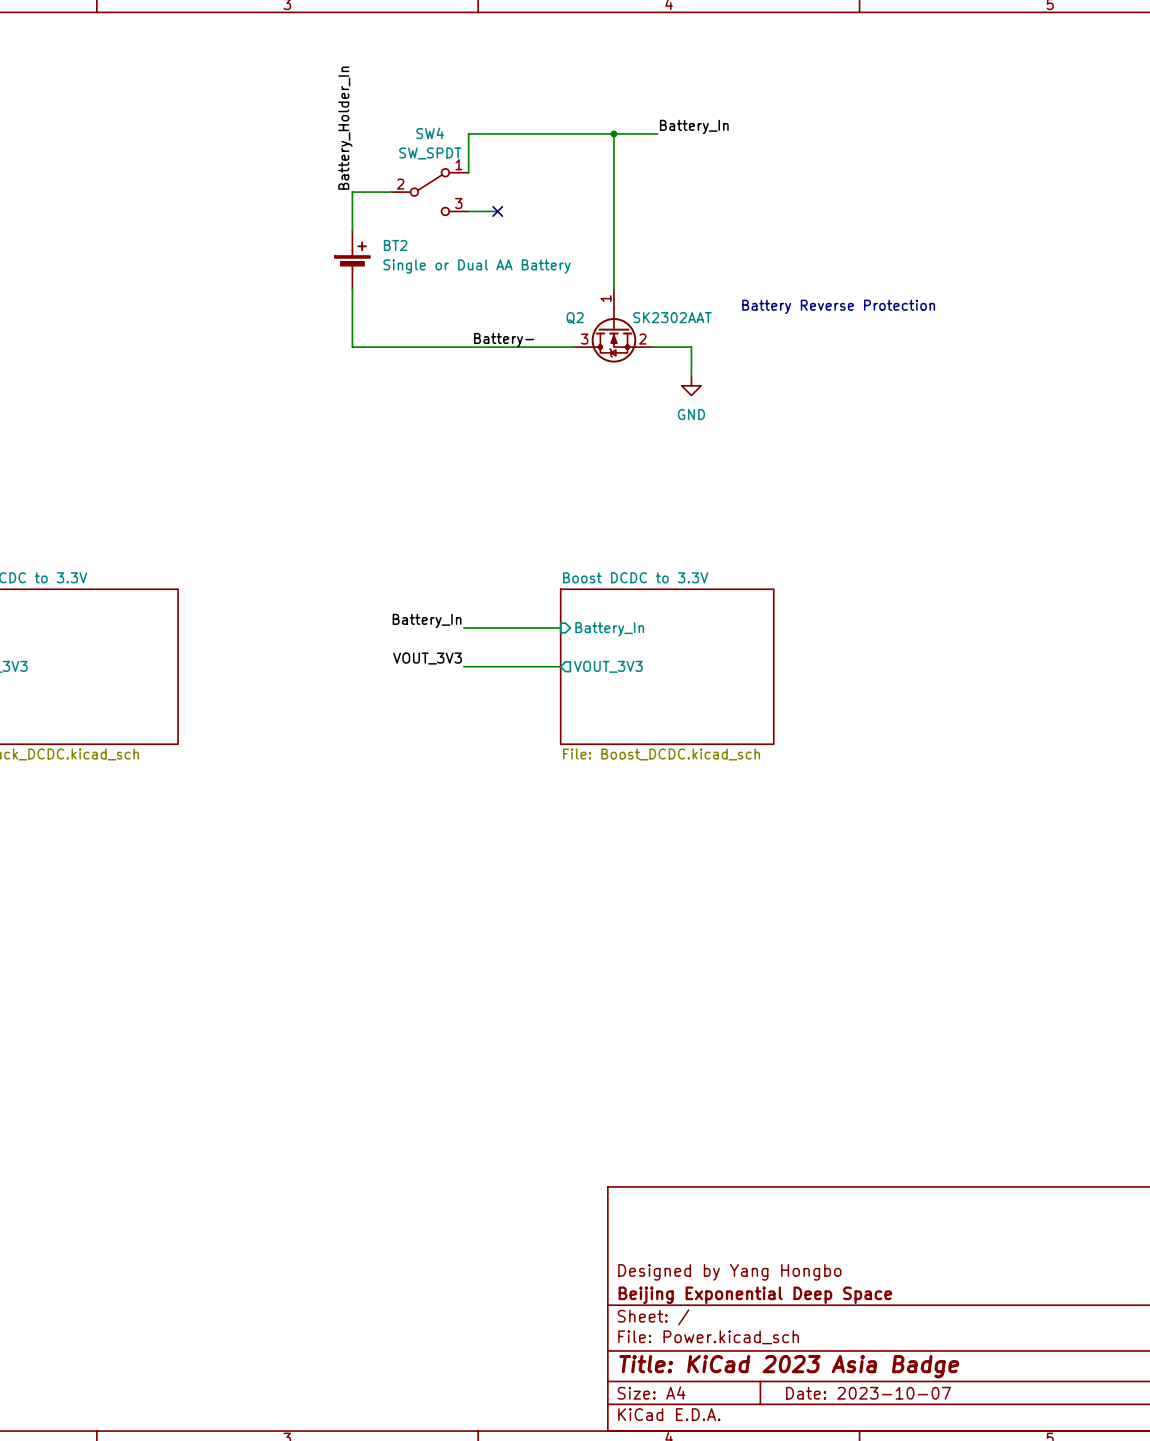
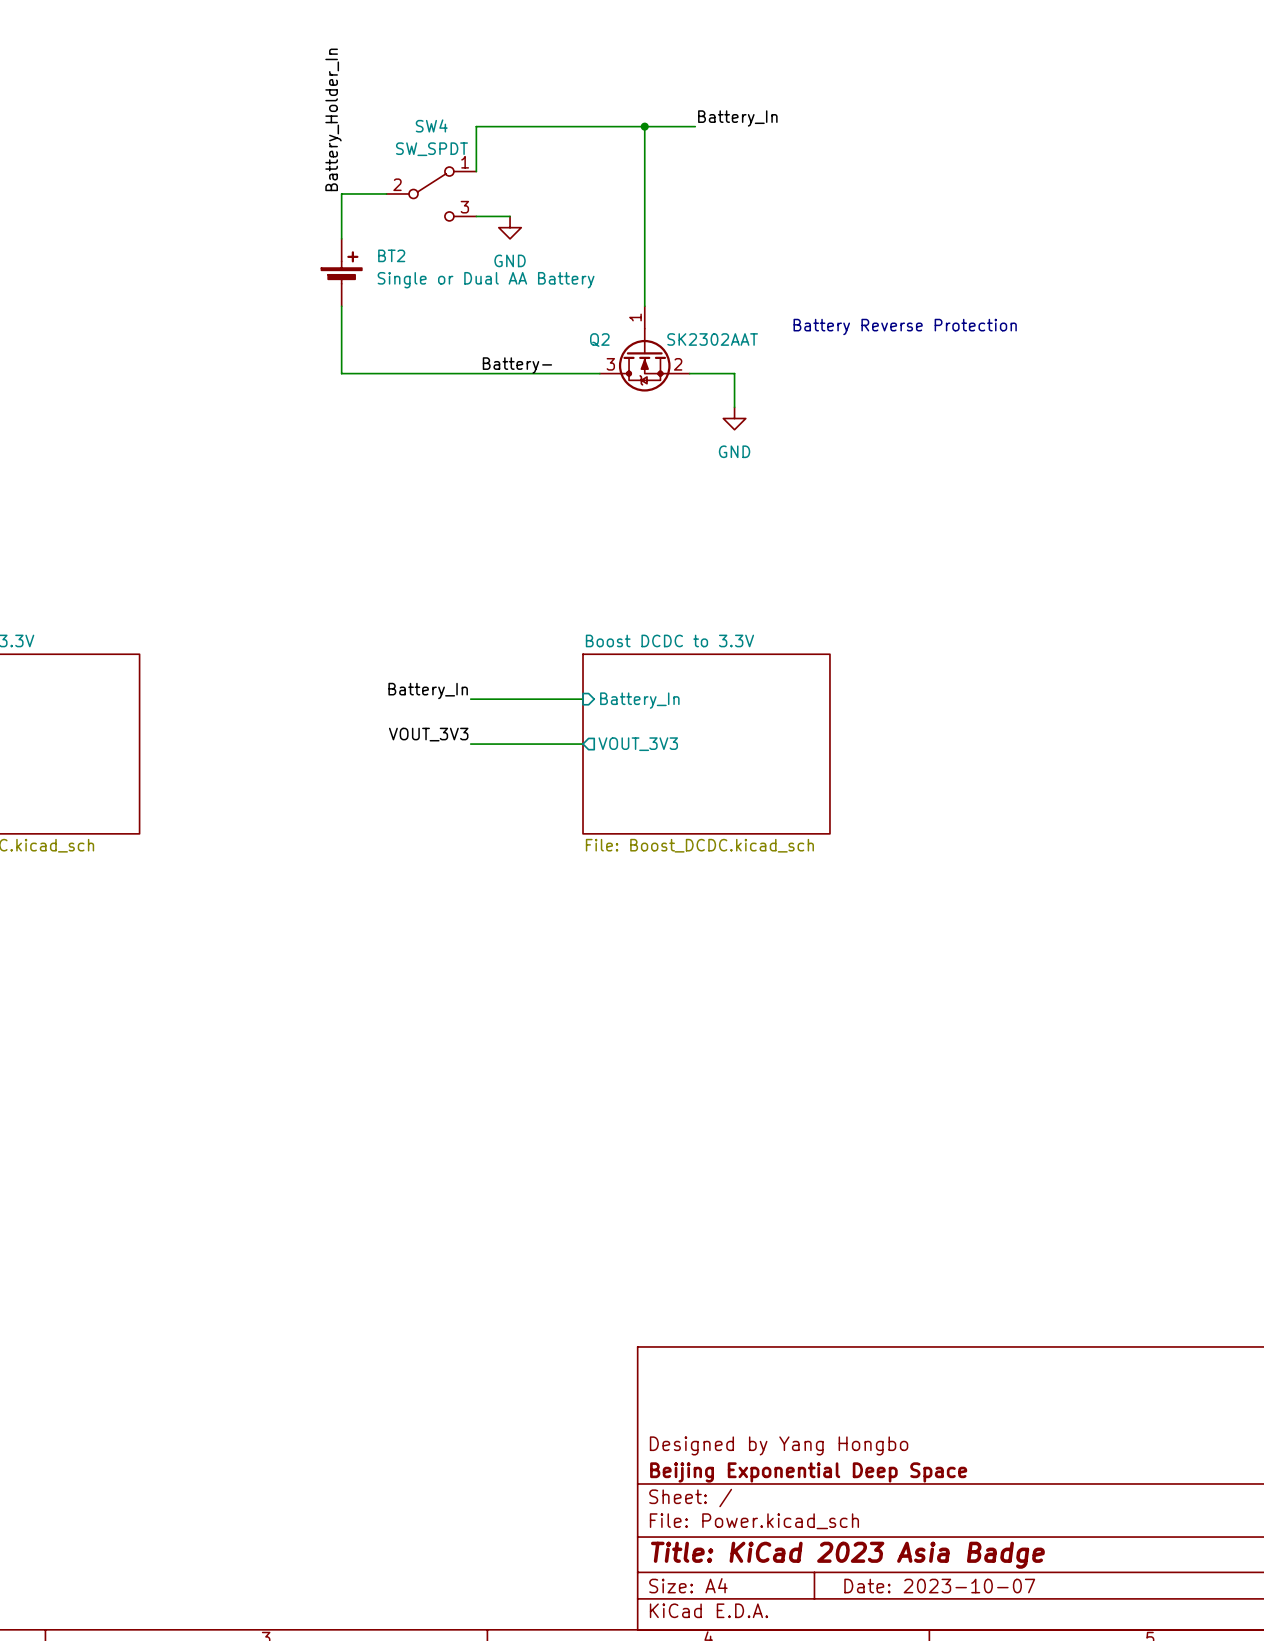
no-connect mark: (497, 211) -> none
power symbol: none -> GND (510, 227)

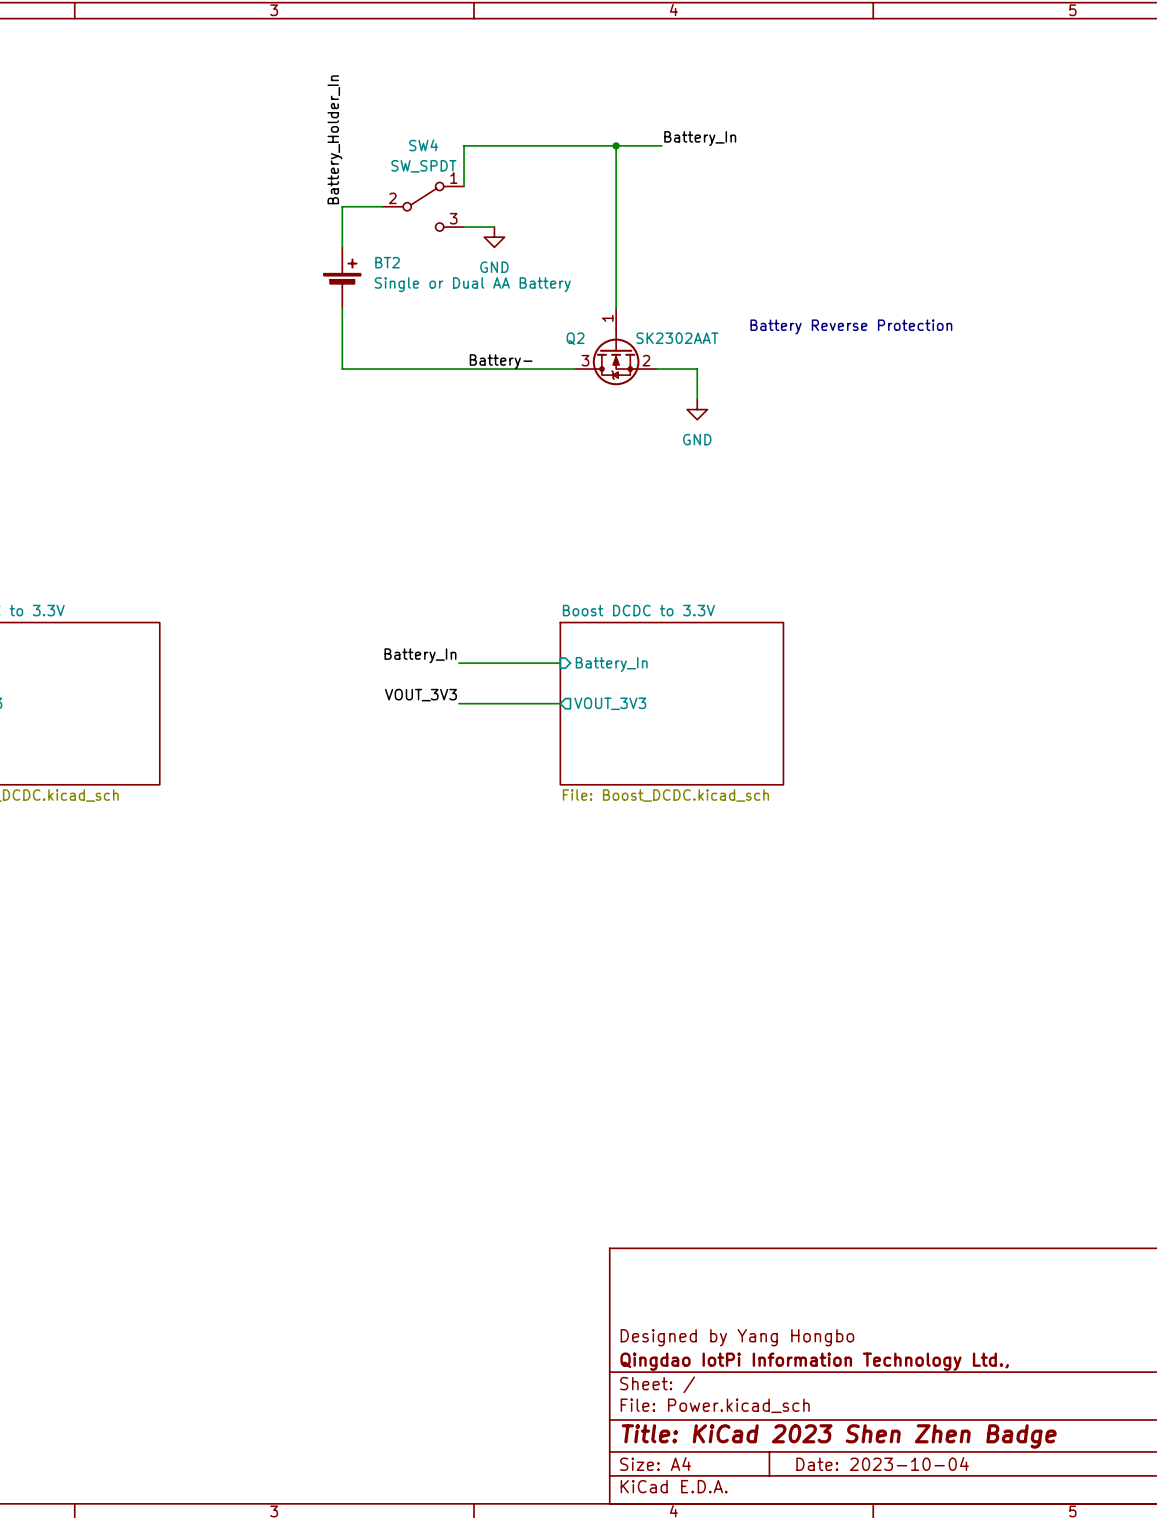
title block: Beijing Exponential Deep Space (808, 1472) -> Qingdao IotPi Information Technology Ltd., (814, 1361)
title block: Title: KiCad 2023 Asia Badge (847, 1555) -> Title: KiCad 2023 Shen Zhen Badge (839, 1436)
title block: Date: 2023-10-07 (939, 1586) -> Date: 2023-10-04 (882, 1464)

